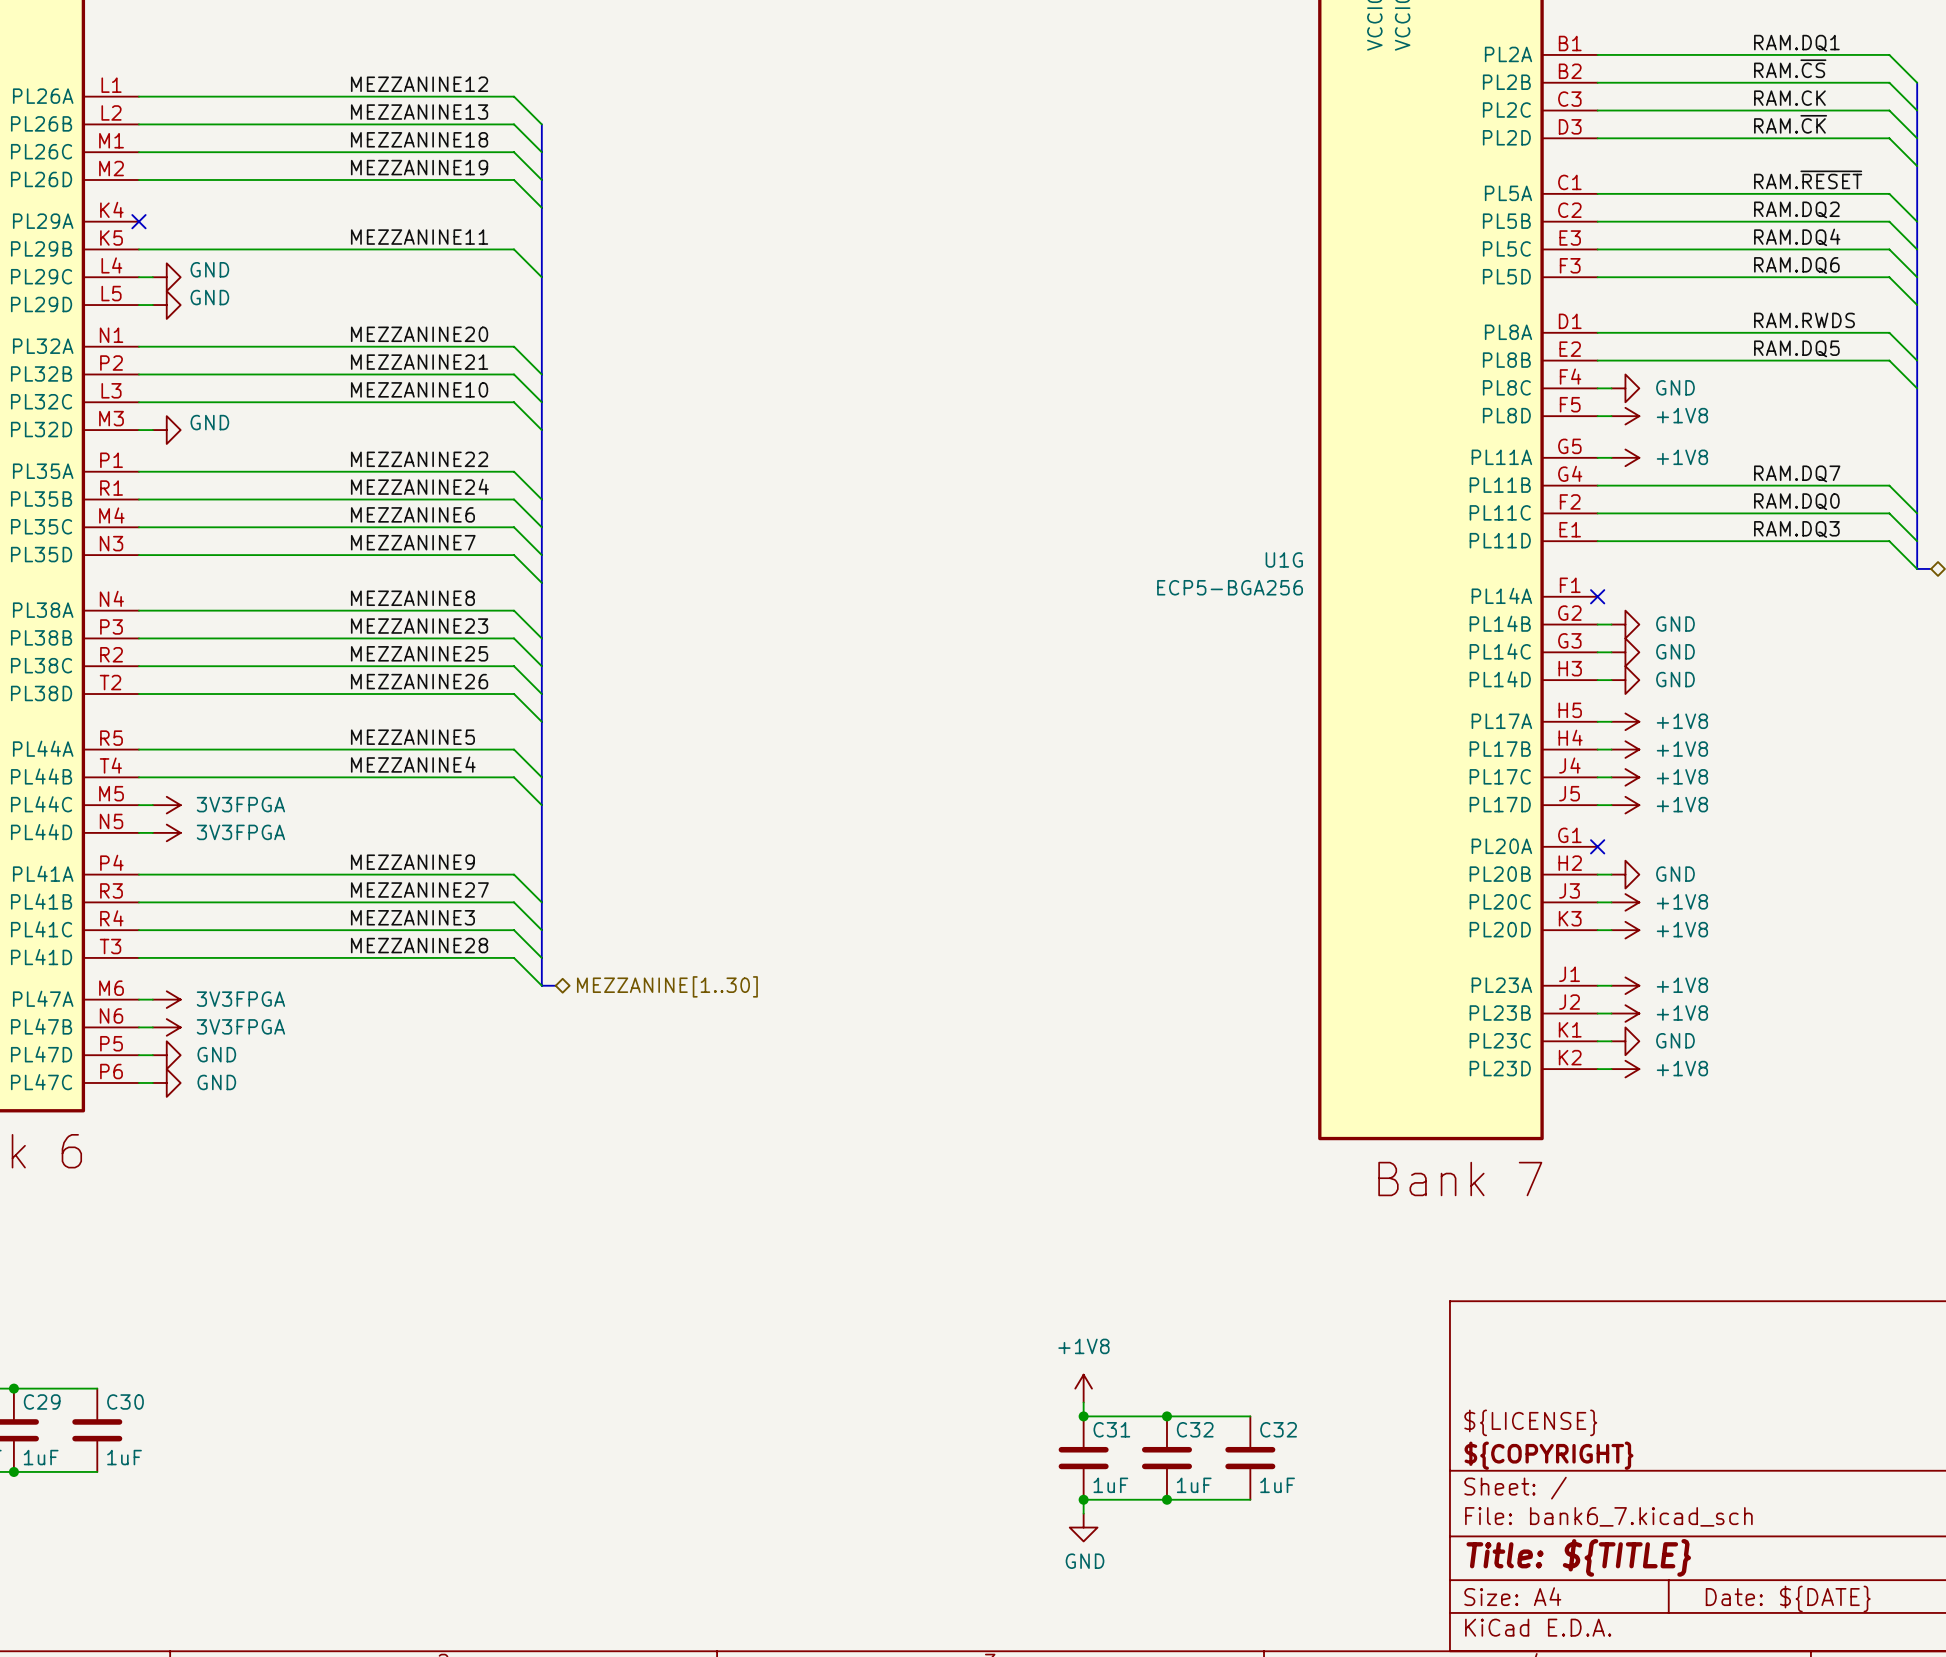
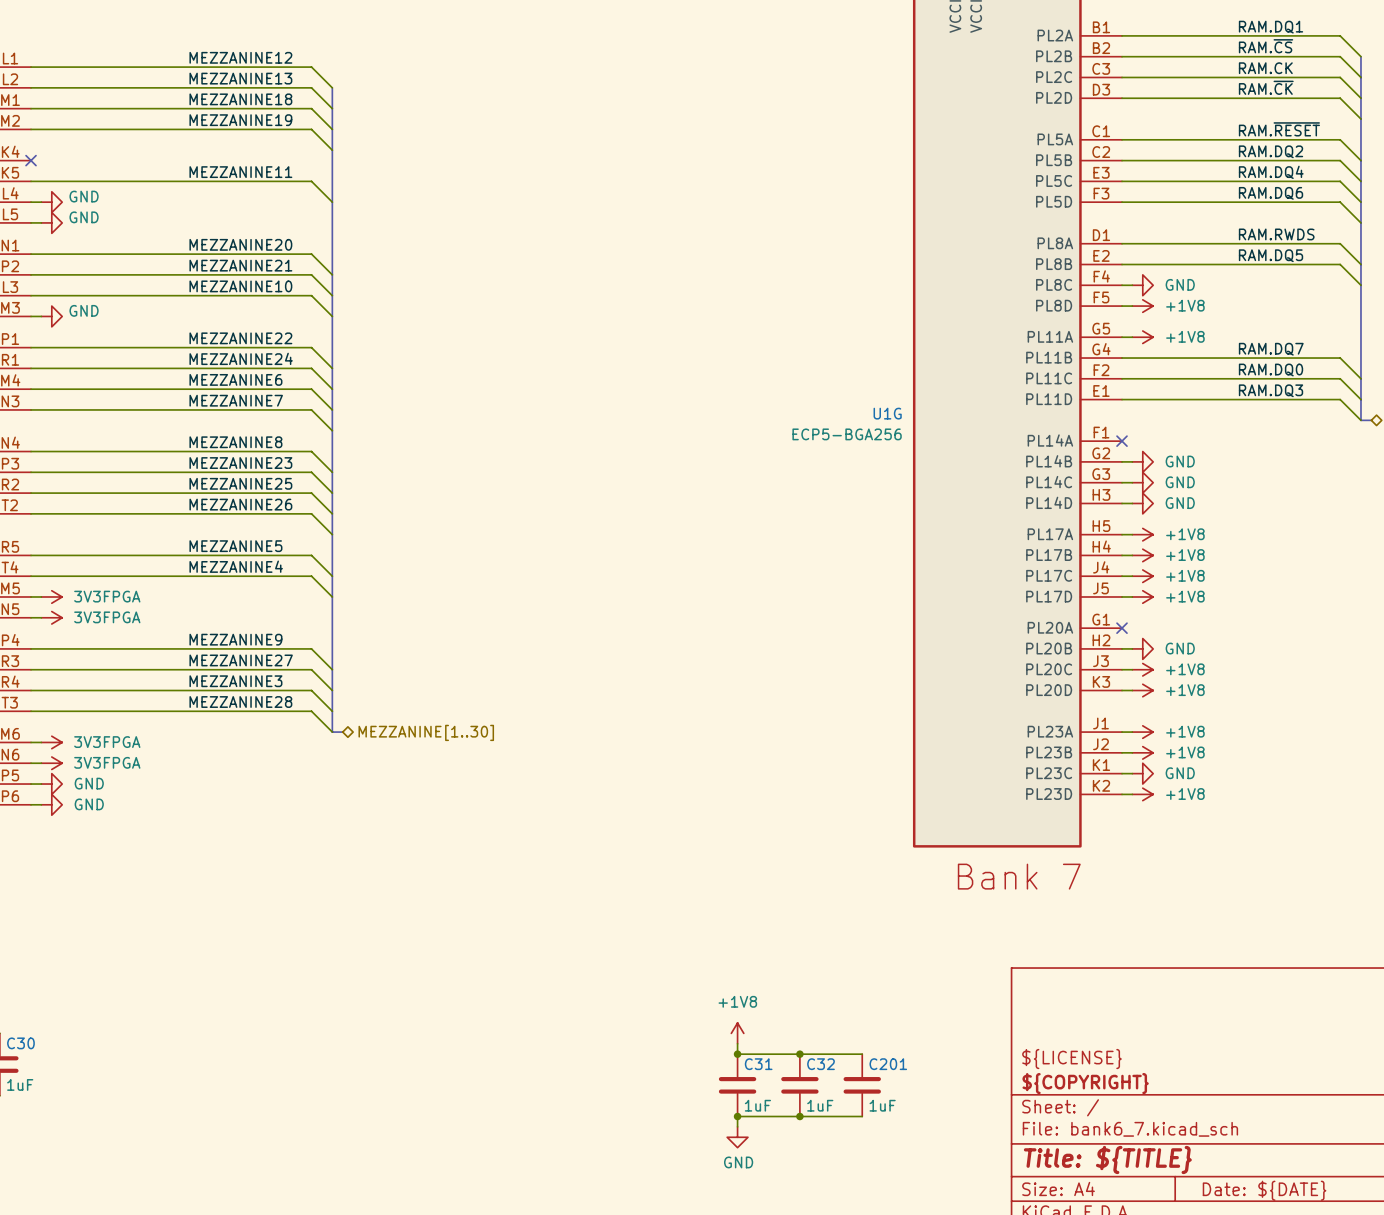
C32 name: C32 (1278, 1429) -> C201 (888, 1064)

